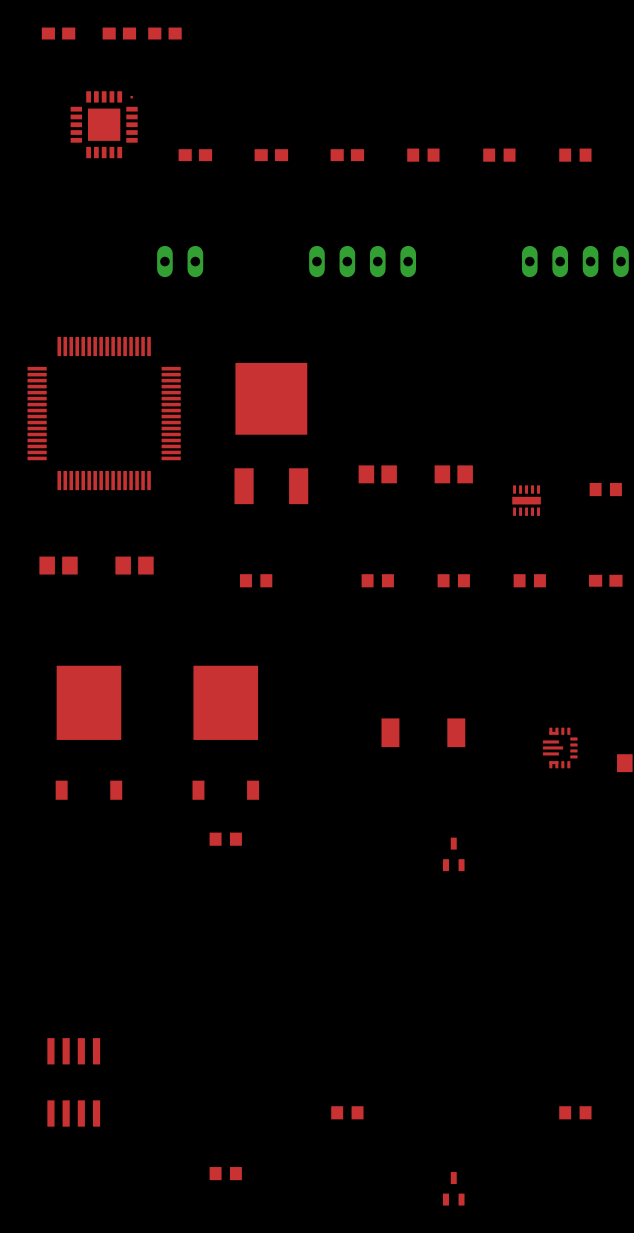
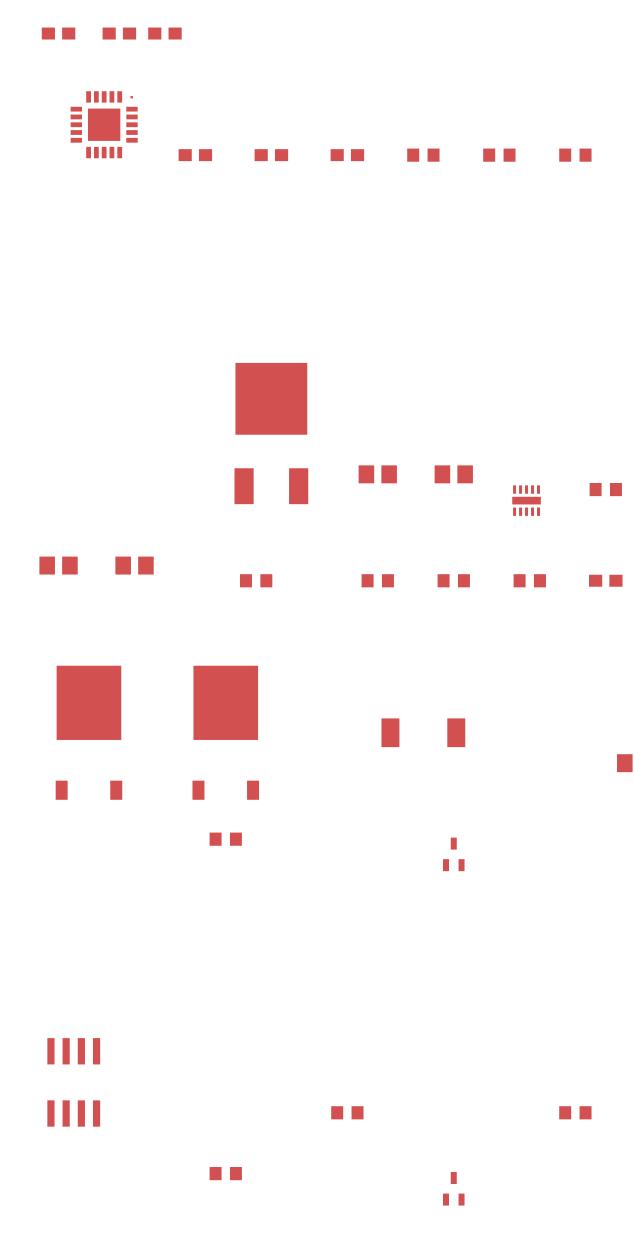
part: (180, 261) -> none
part: (362, 261) -> none
part: (575, 261) -> none
part: (104, 413) -> none
part: (560, 747) -> none

